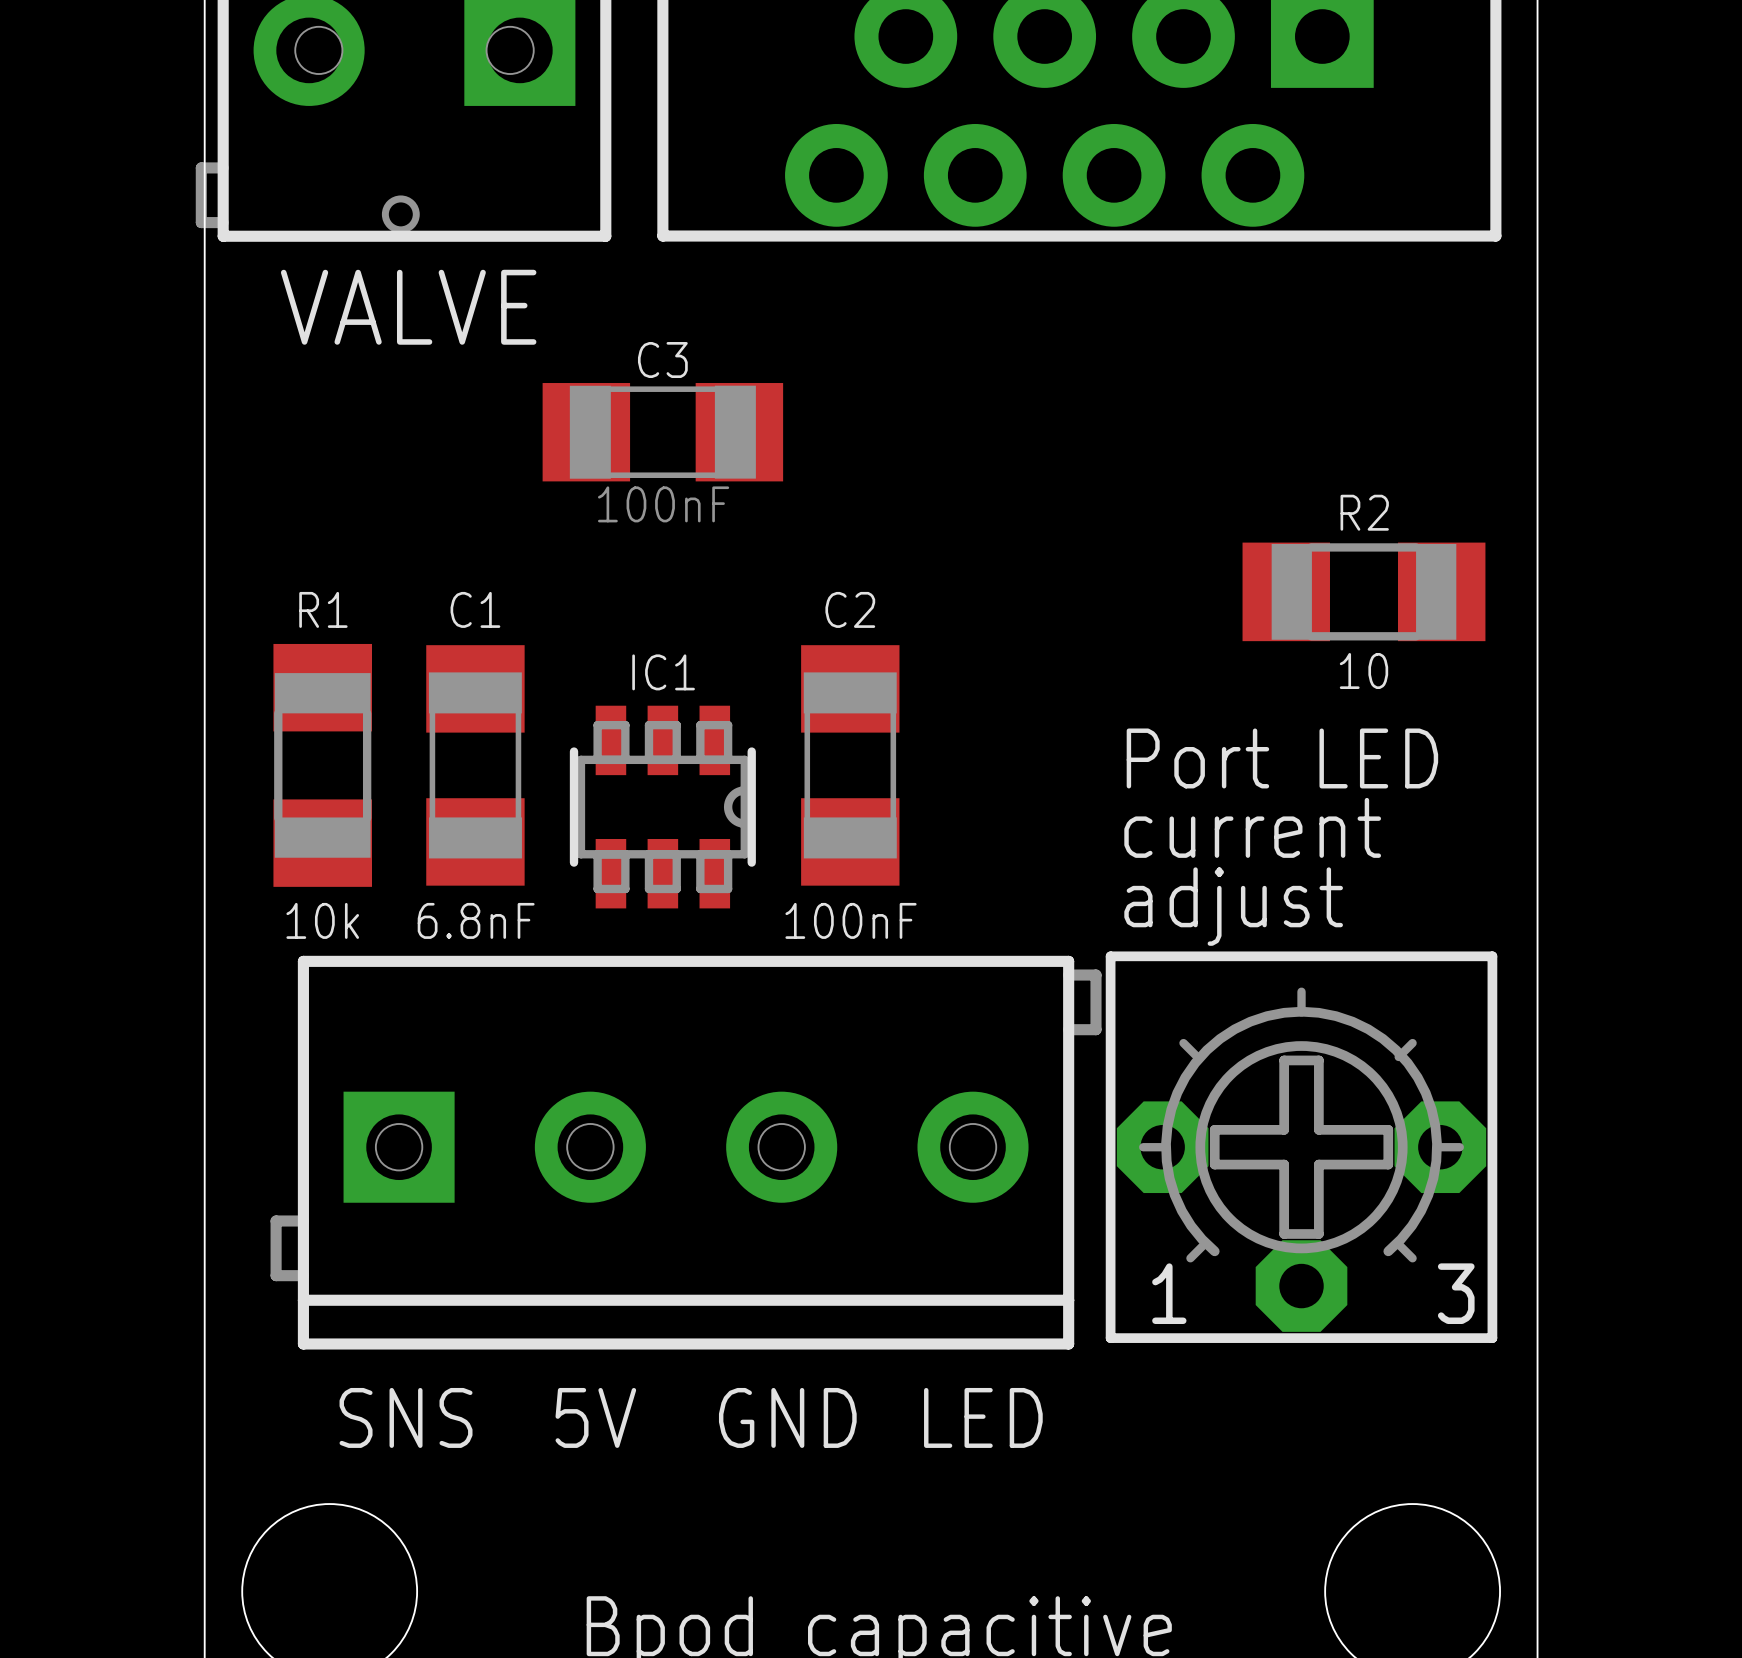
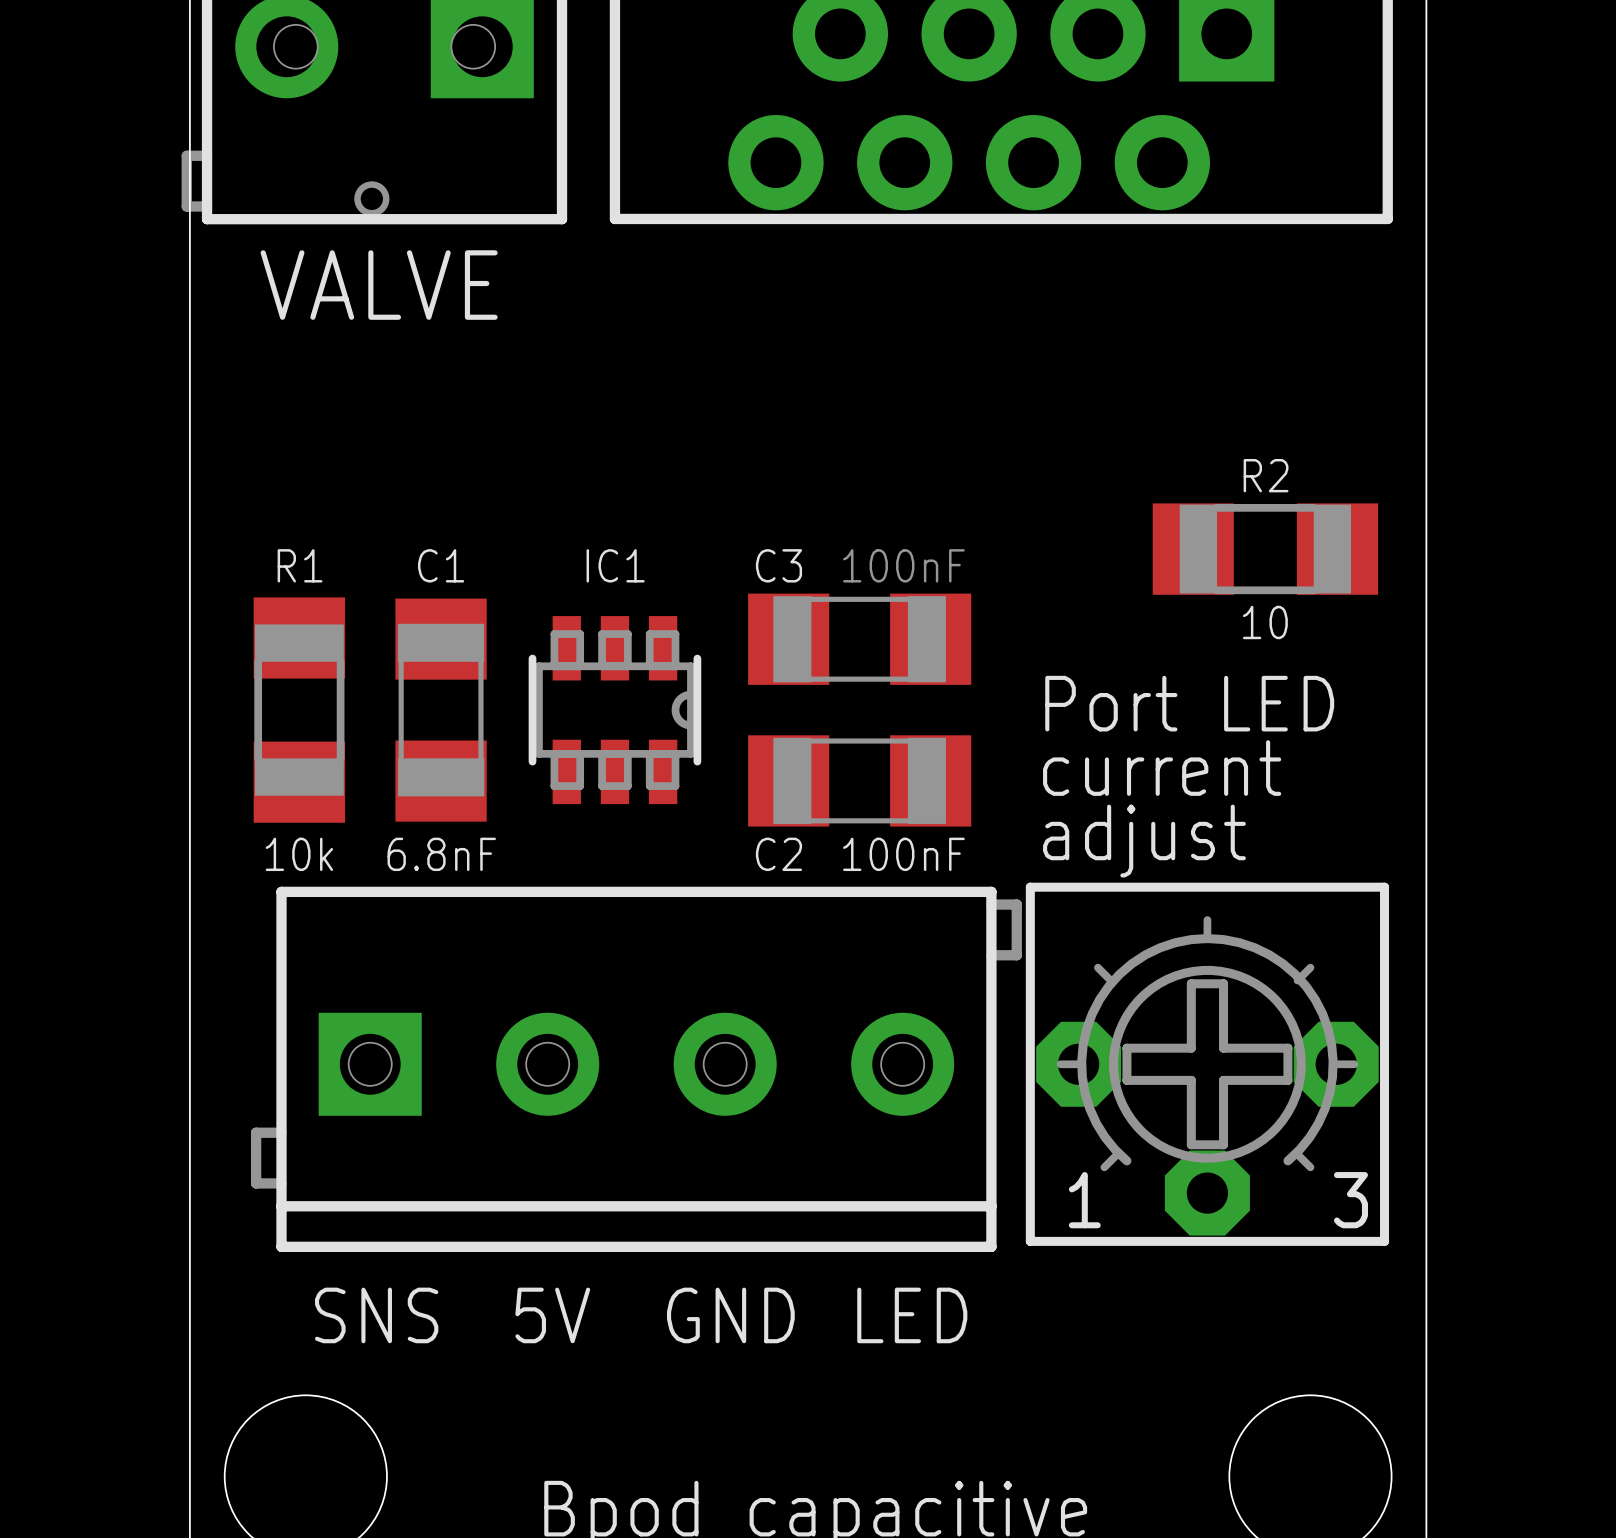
C3 name position: C3 (662, 360) -> C3 (778, 565)
C3 position: (662, 432) -> (859, 639)
C3 value position: 100nF (663, 504) -> 100nF (903, 565)
C2 name position: C2 (850, 609) -> C2 (778, 854)
IC1 name position: IC1 (663, 672) -> IC1 (615, 565)
C2 rotation: 0° (850, 765) -> 90° clockwise (859, 780)
IC1 position: (662, 807) -> (614, 710)

